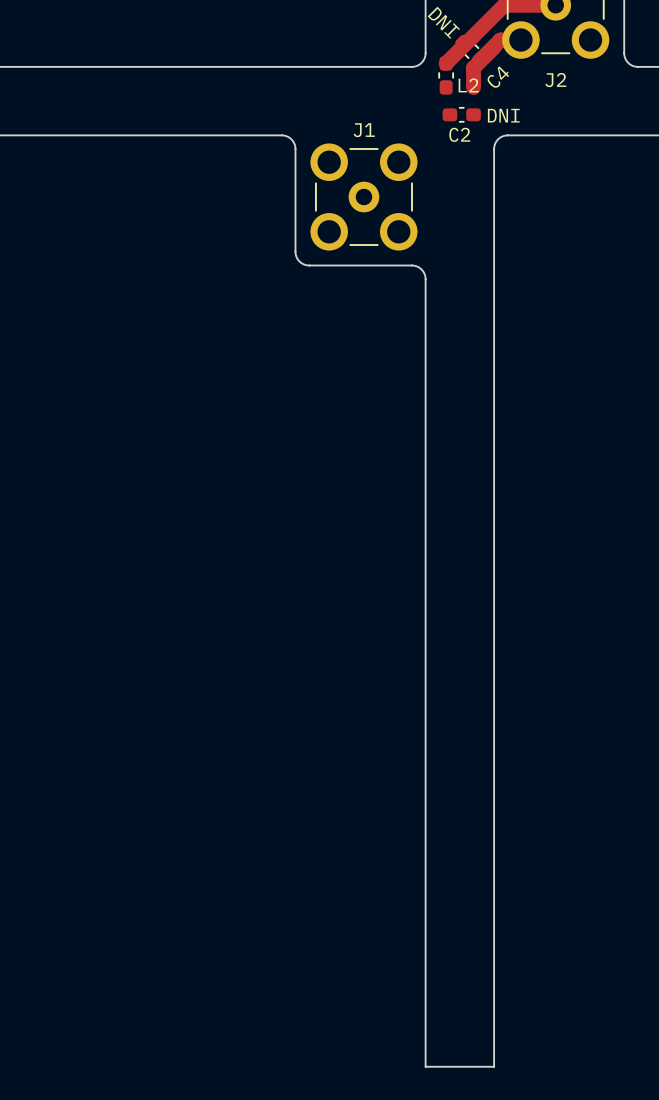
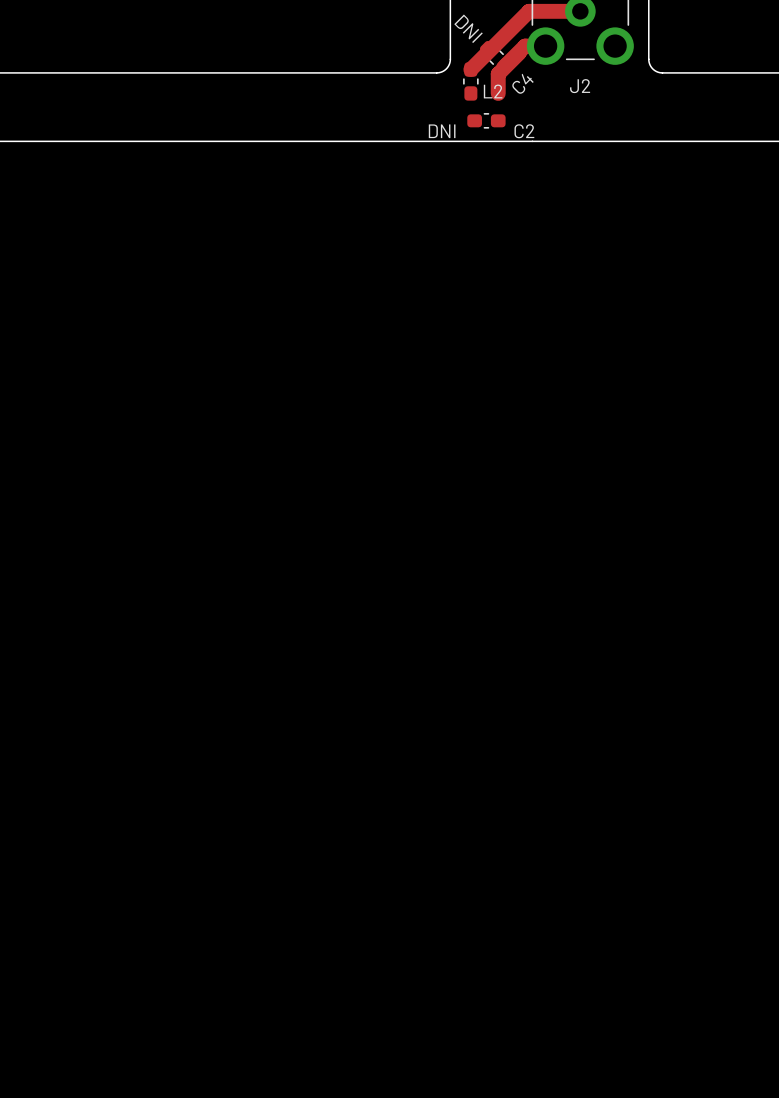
C2 value position: DNI (503, 115) -> DNI (442, 131)
C2 name position: C2 (459, 134) -> C2 (524, 131)
board edge: (281, 135) (290, 138) (295, 147) (295, 251) (299, 261) (309, 265) (413, 265) (421, 269) (425, 277) (425, 1066) (494, 1066) (494, 149) (498, 139) (507, 135) -> (306, 141) (532, 141)
J1: (363, 197) -> none

